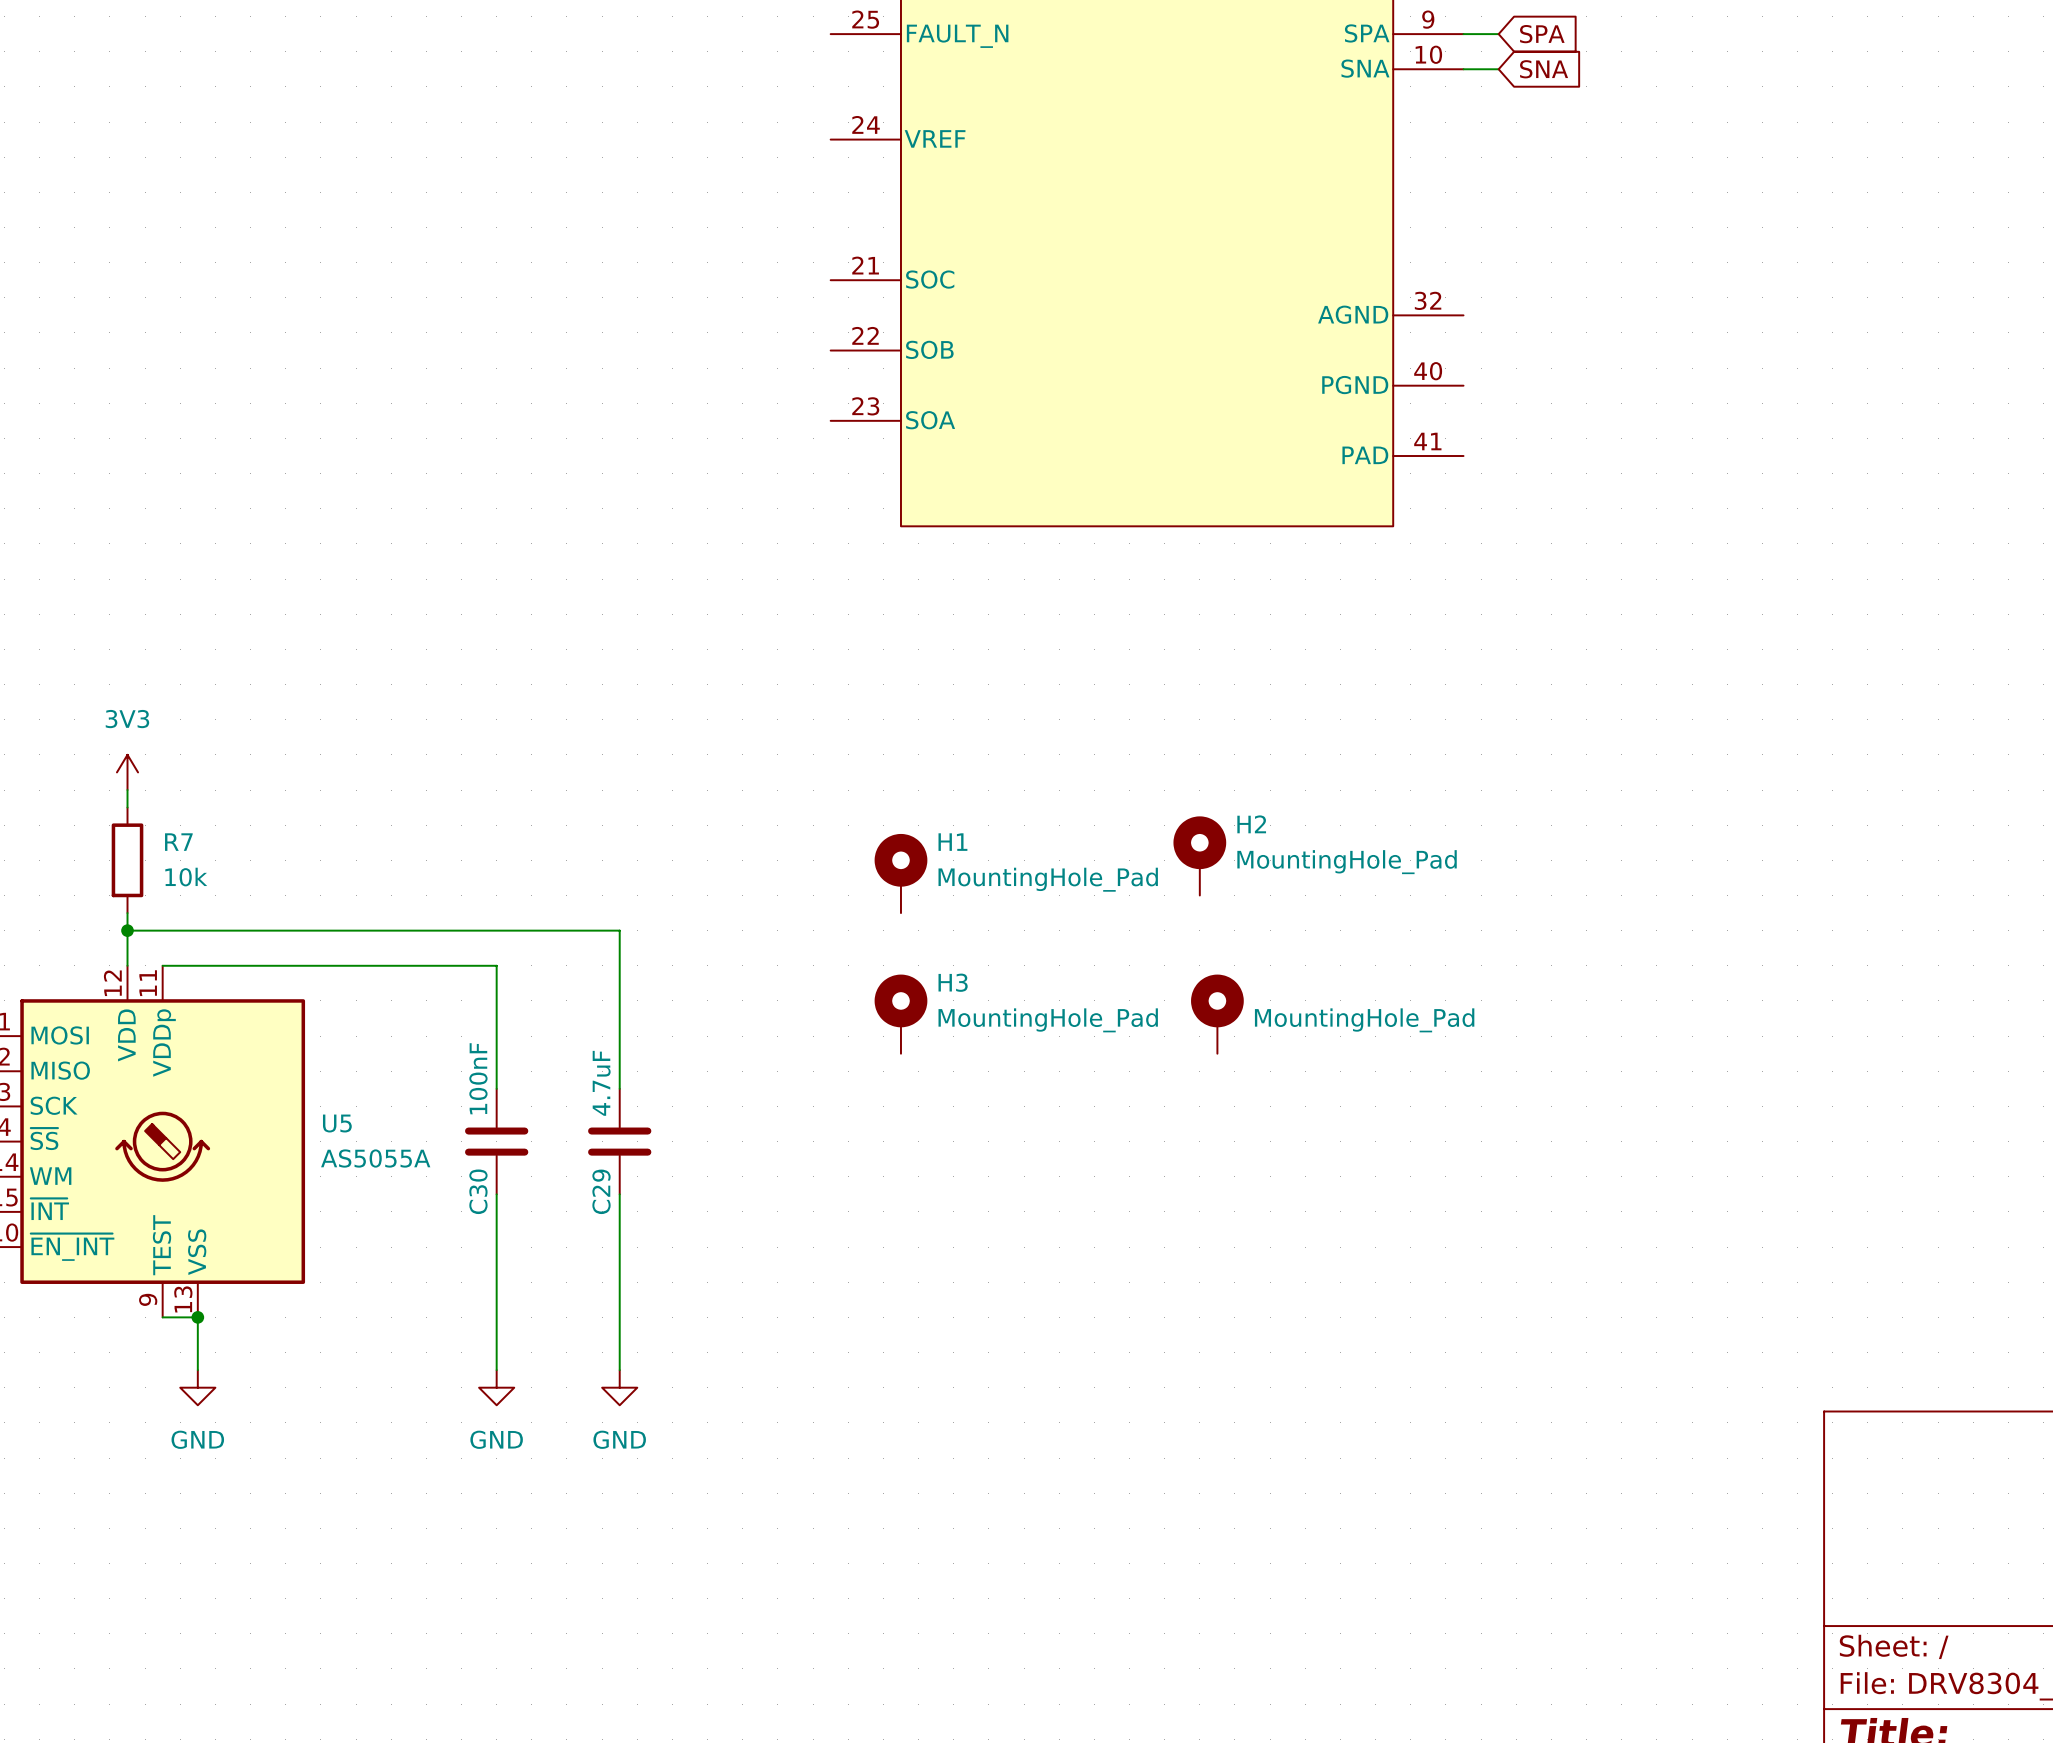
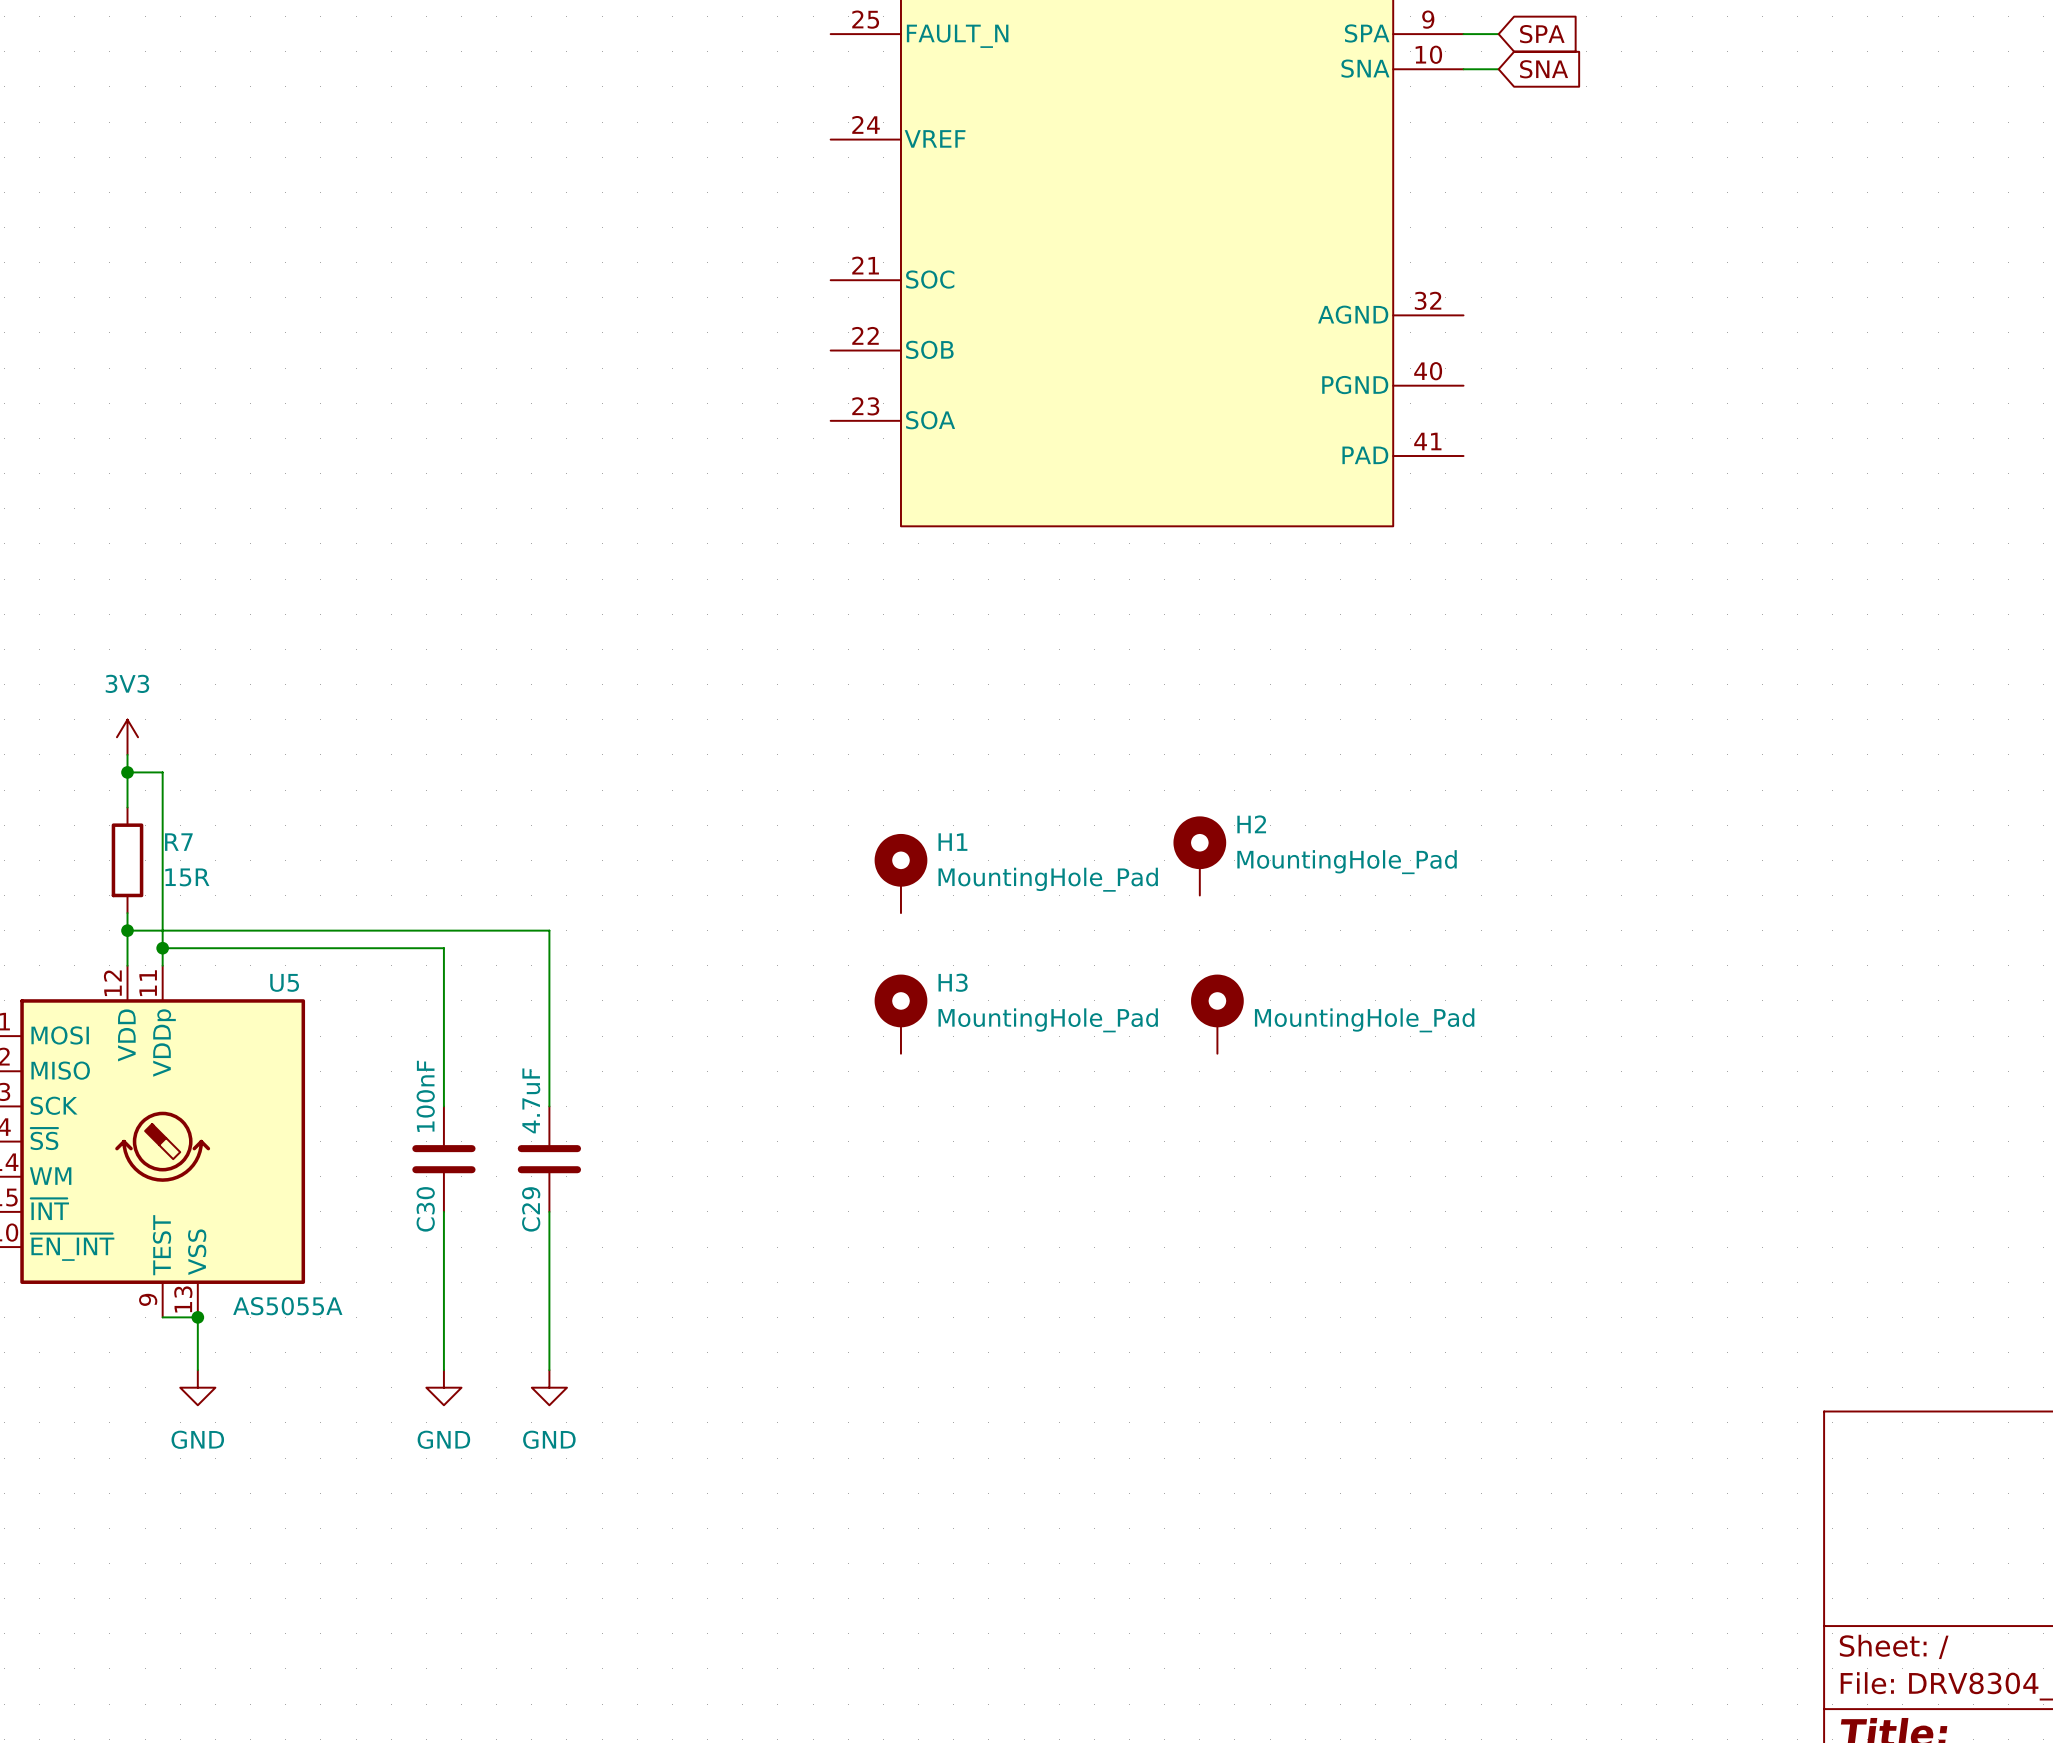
power symbol position: 3V3 (127, 772) -> 3V3 (127, 737)
junction: none -> (127, 772)
R7 value: 10k (186, 877) -> 15R (187, 877)
wire: (549, 930) (619, 930) (619, 1088) -> (549, 930) (549, 1106)
wire: none -> (162, 948) (443, 948) (443, 1106)
junction: none -> (162, 948)
wire: (162, 965) (496, 965) (496, 1088) -> (162, 965) (162, 772) (127, 772)
U5 name position: U5 (337, 1123) -> U5 (284, 982)
C30 position: (496, 1141) -> (443, 1159)
C29 position: (619, 1141) -> (549, 1159)
U5 value position: AS5055A (375, 1158) -> AS5055A (287, 1306)
wire: (496, 1194) (496, 1370) -> none
wire: (619, 1194) (619, 1370) -> none
wire: none -> (443, 1211) (443, 1370)
wire: none -> (549, 1211) (549, 1370)
power symbol: none -> GND (443, 1387)
power symbol: GND (496, 1387) -> none
power symbol: none -> GND (549, 1387)
power symbol: GND (619, 1387) -> none

